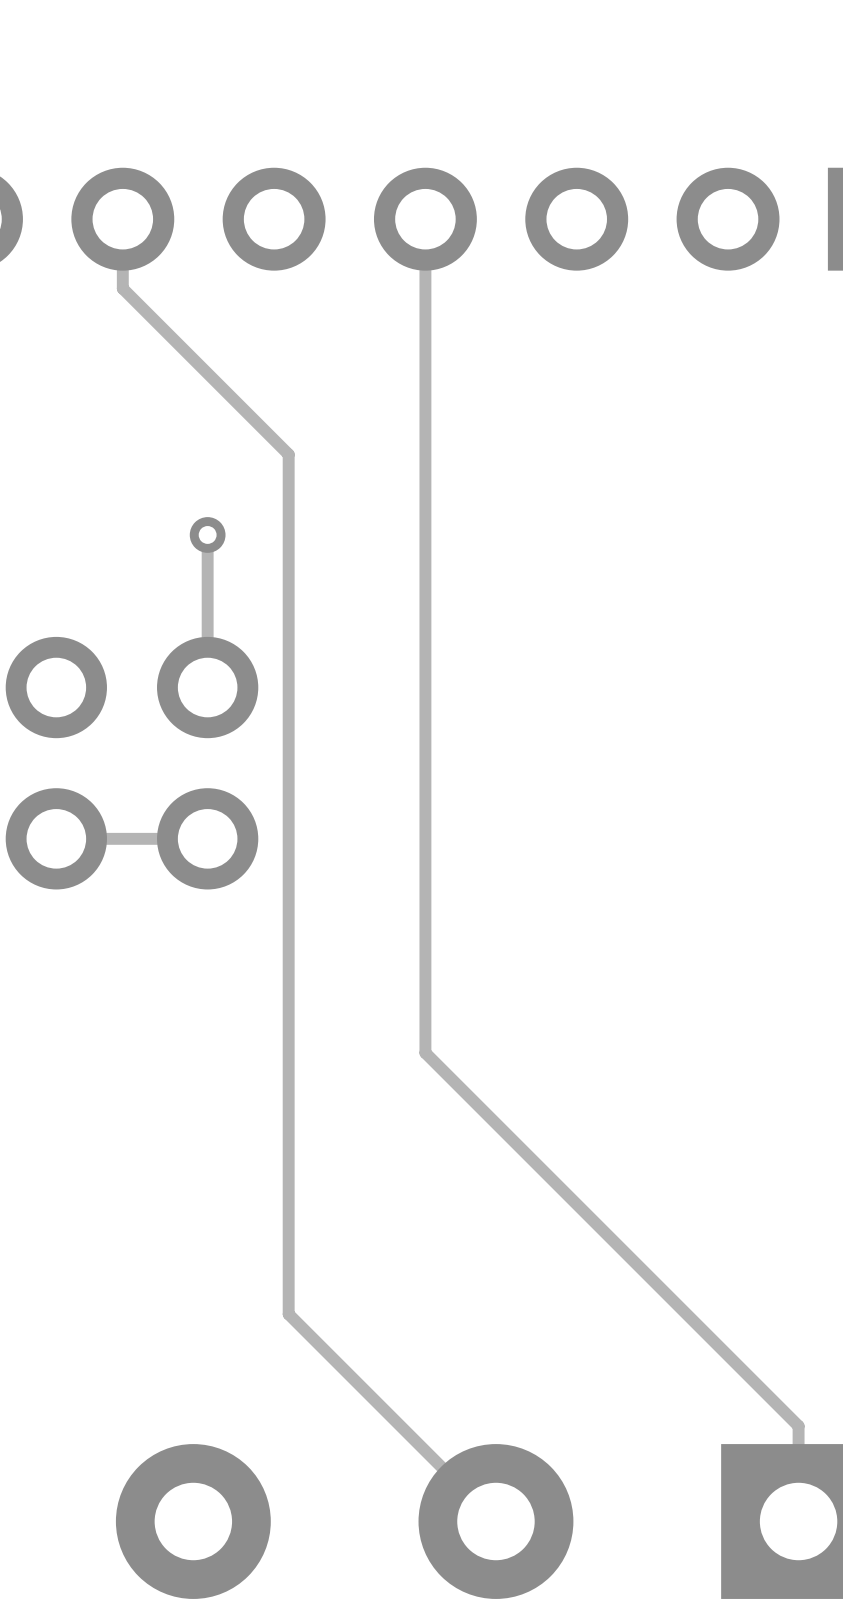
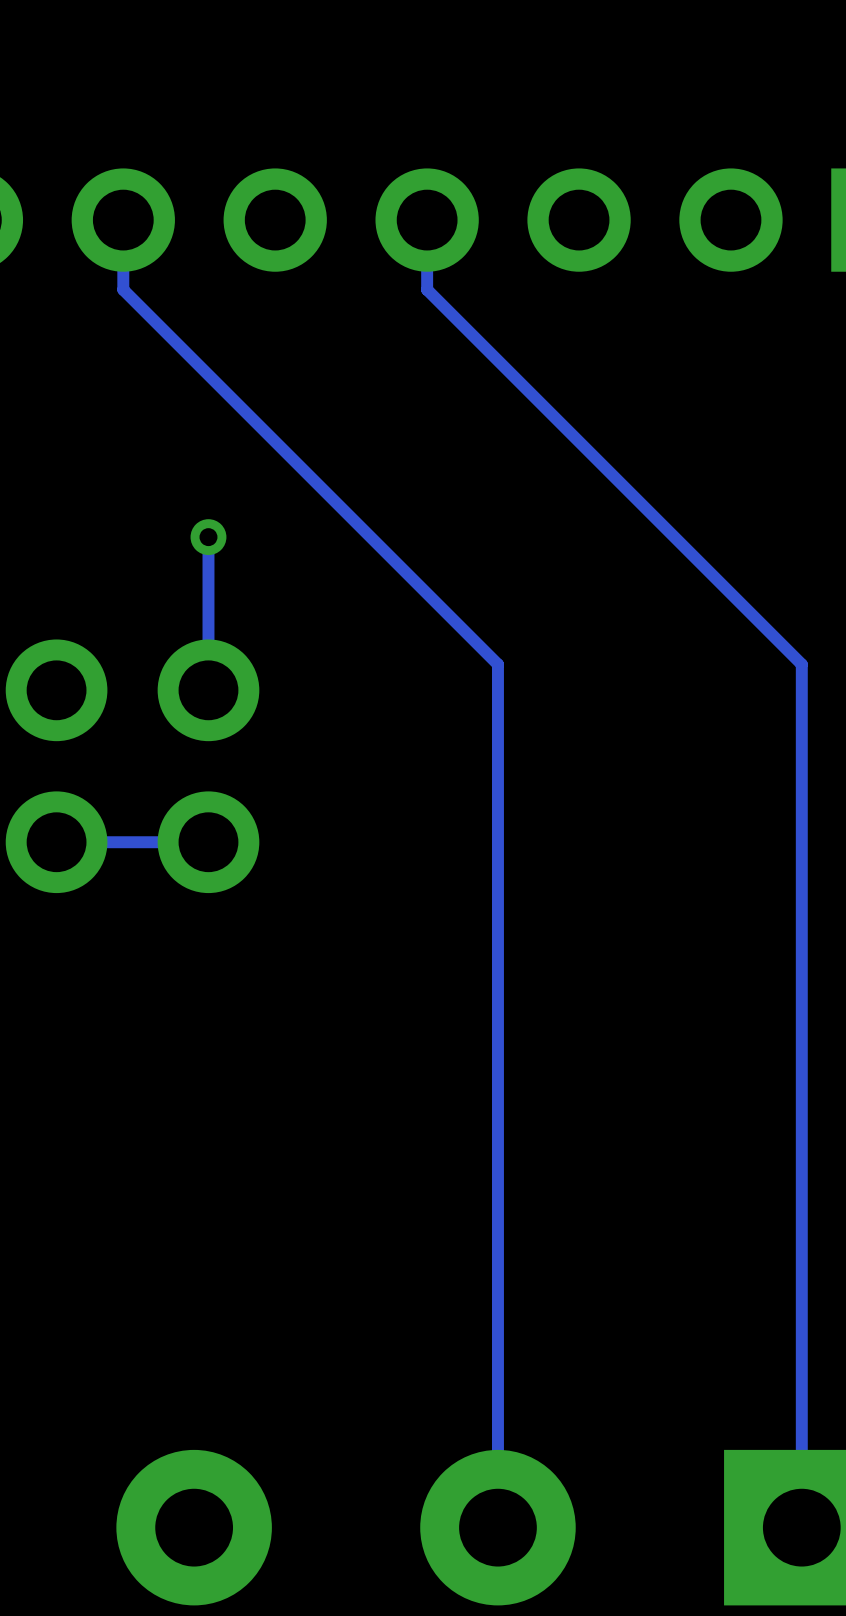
track: (425, 288) (425, 1052) (798, 1426) -> (427, 289) (801, 664) (801, 1431)
track: (288, 454) (288, 1314) (495, 1521) -> (289, 456) (497, 664) (497, 1527)

